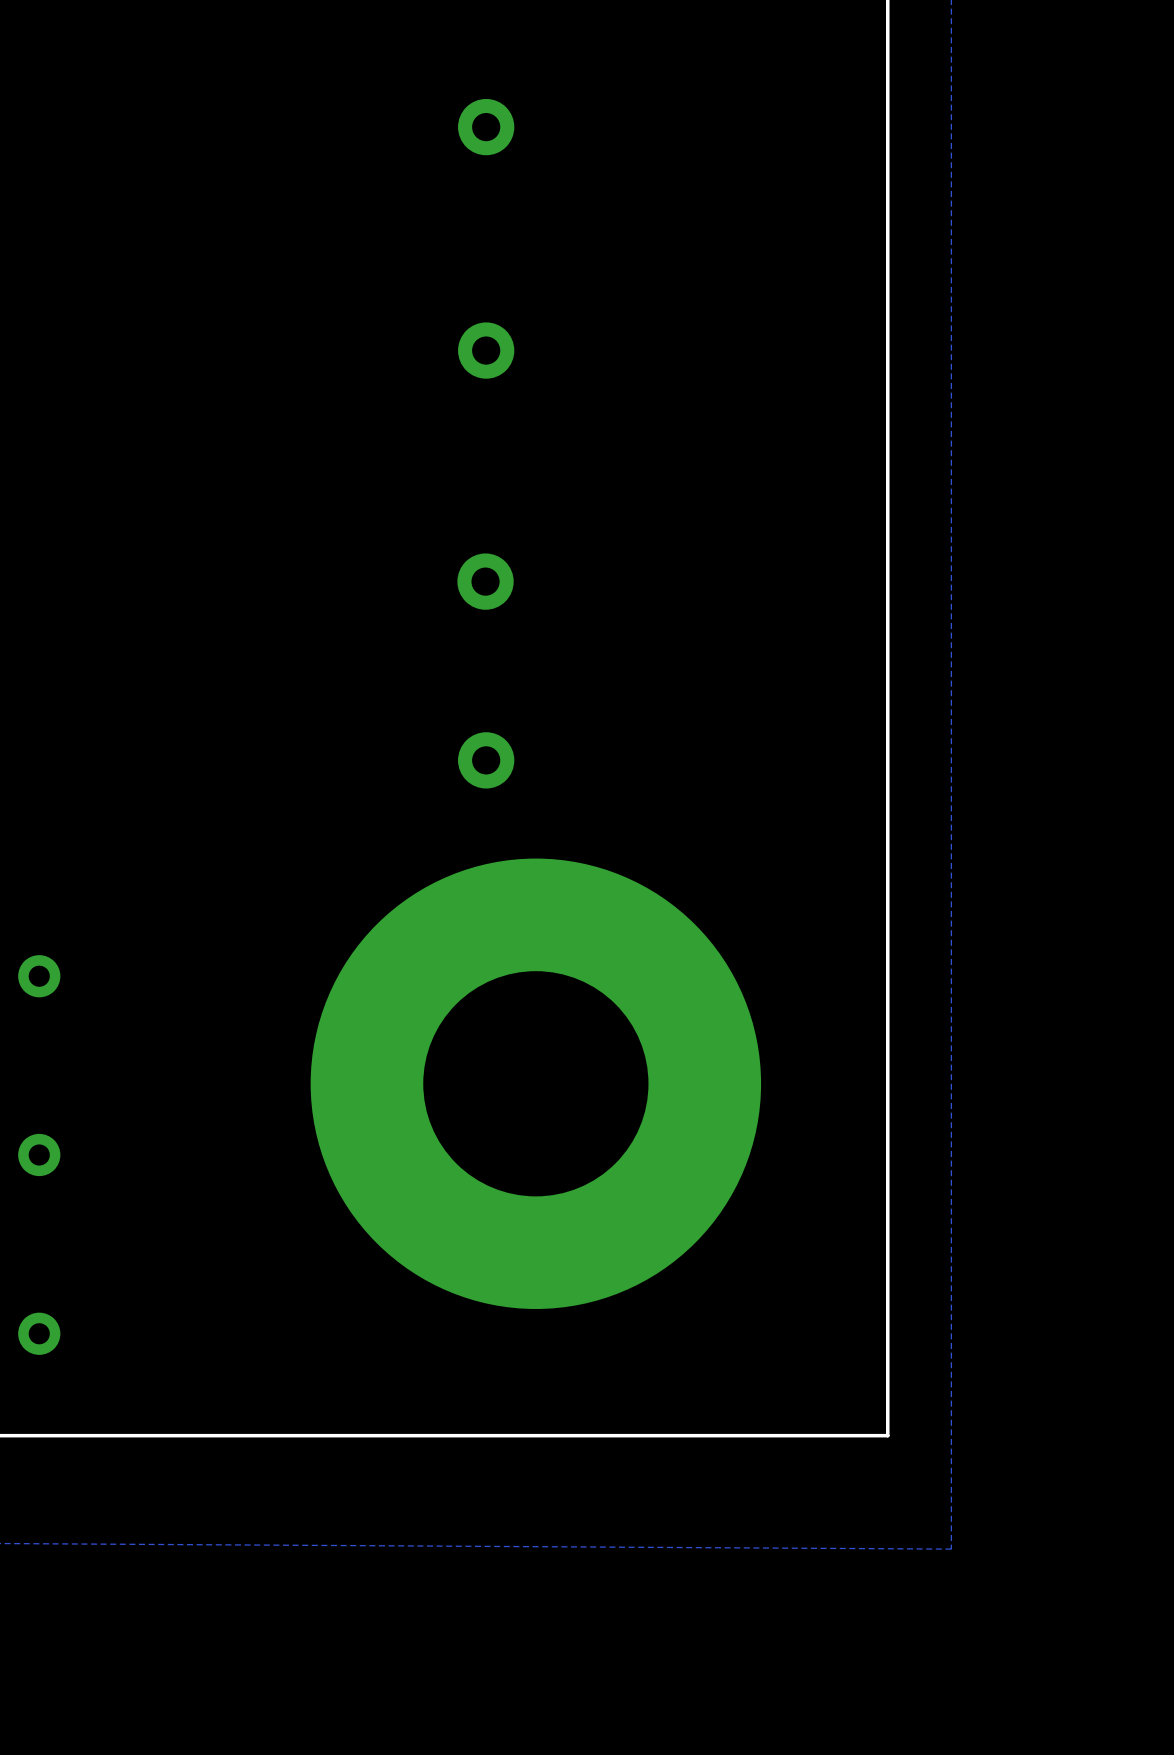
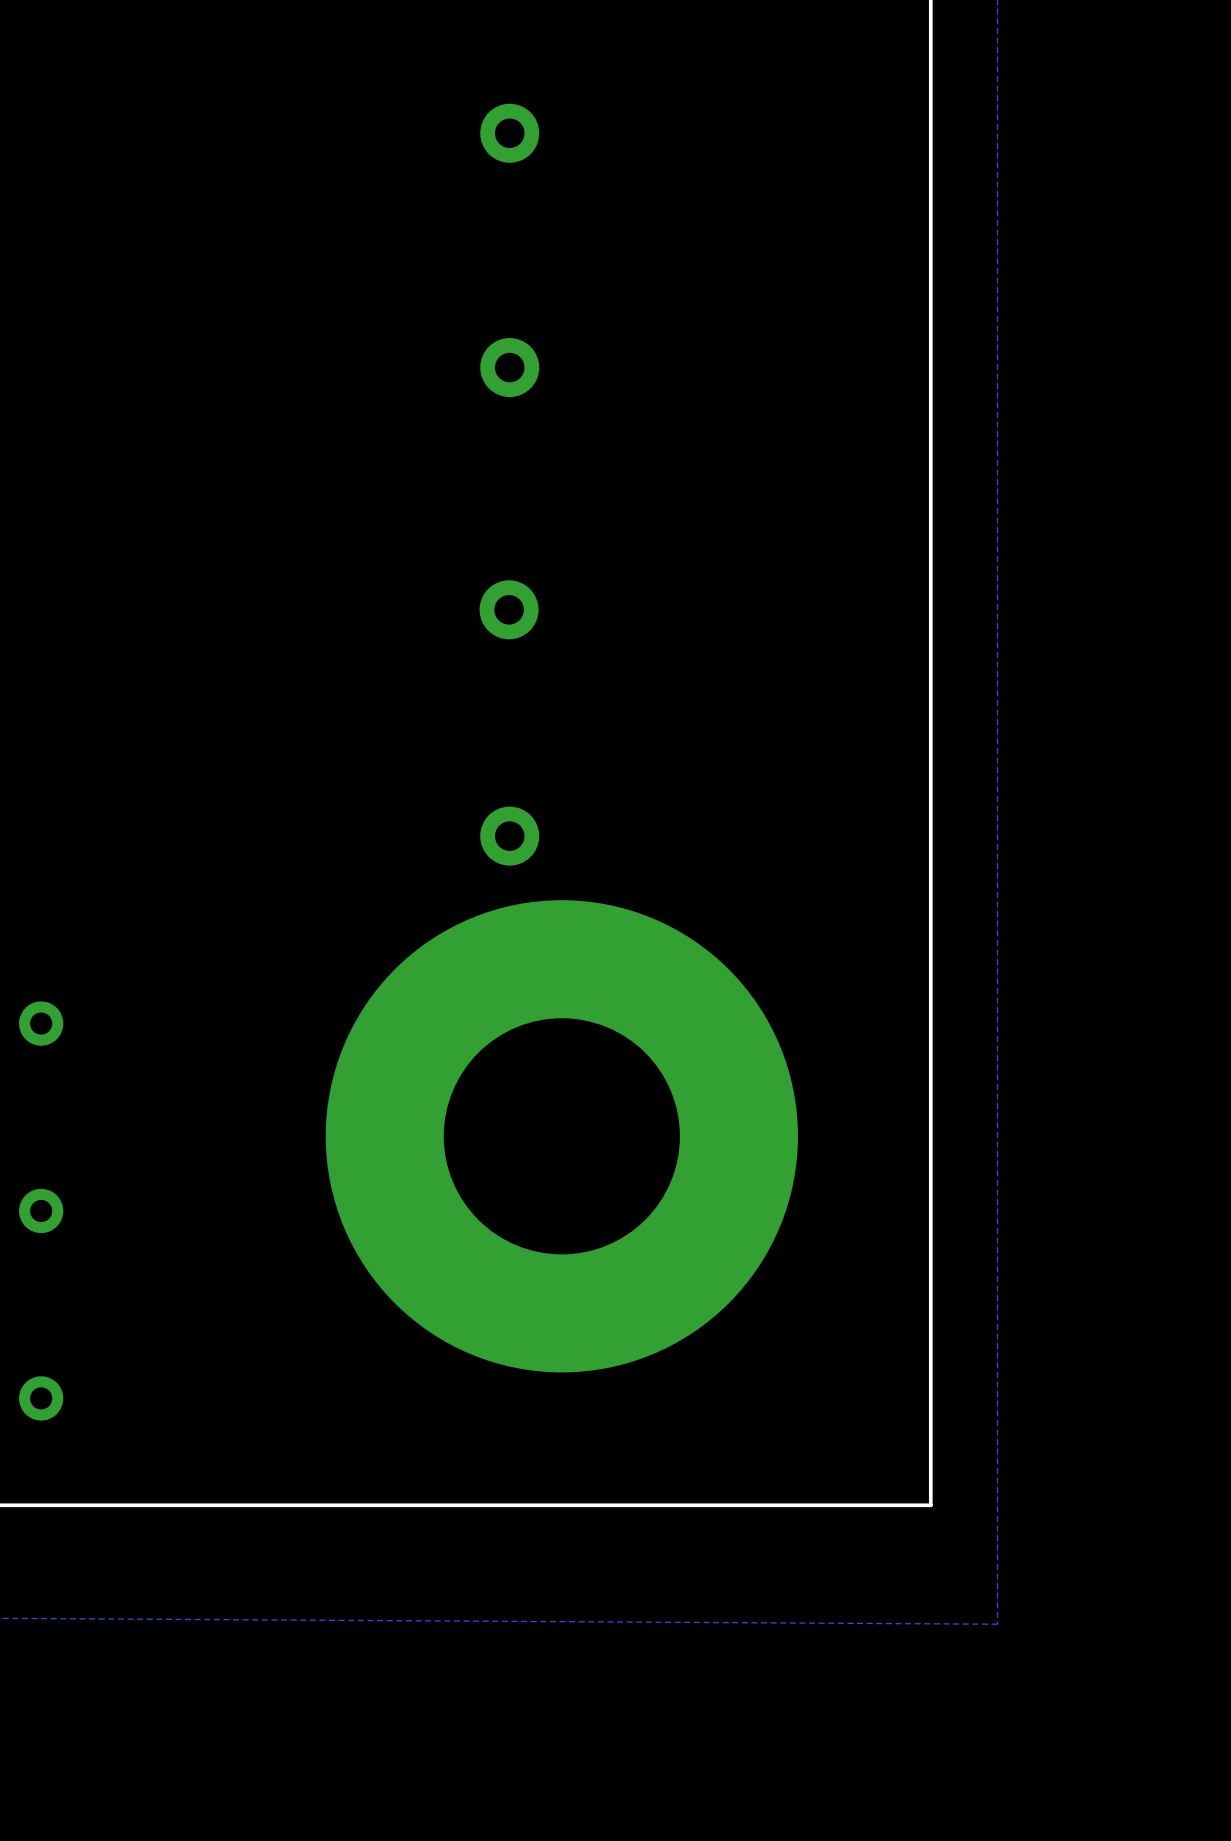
via position: (486, 760) -> (509, 836)

